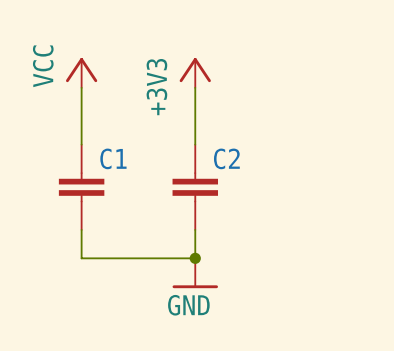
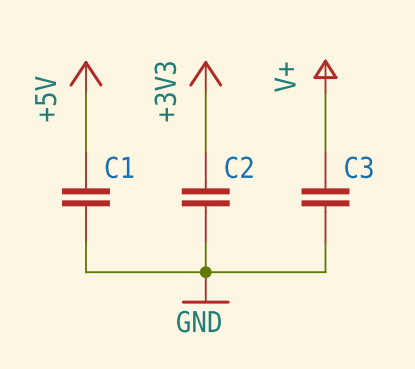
power symbol: VCC (81, 72) -> +5V (85, 76)
power symbol: none -> V+ (325, 76)
wire: none -> (325, 92) (325, 152)
C3: none -> (325, 197)
wire: none -> (325, 242) (325, 272) (205, 272)

